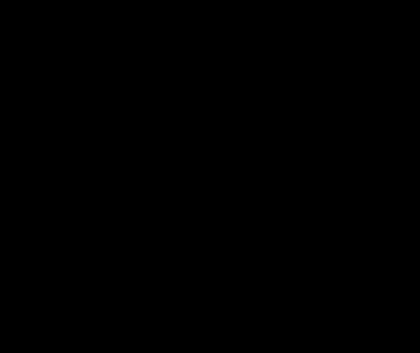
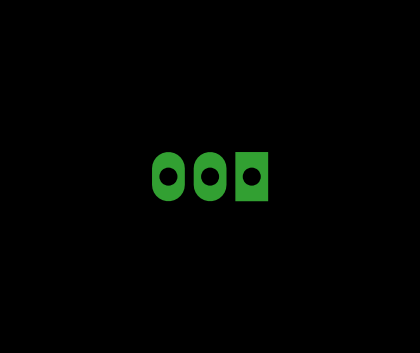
part: none -> (210, 176)

